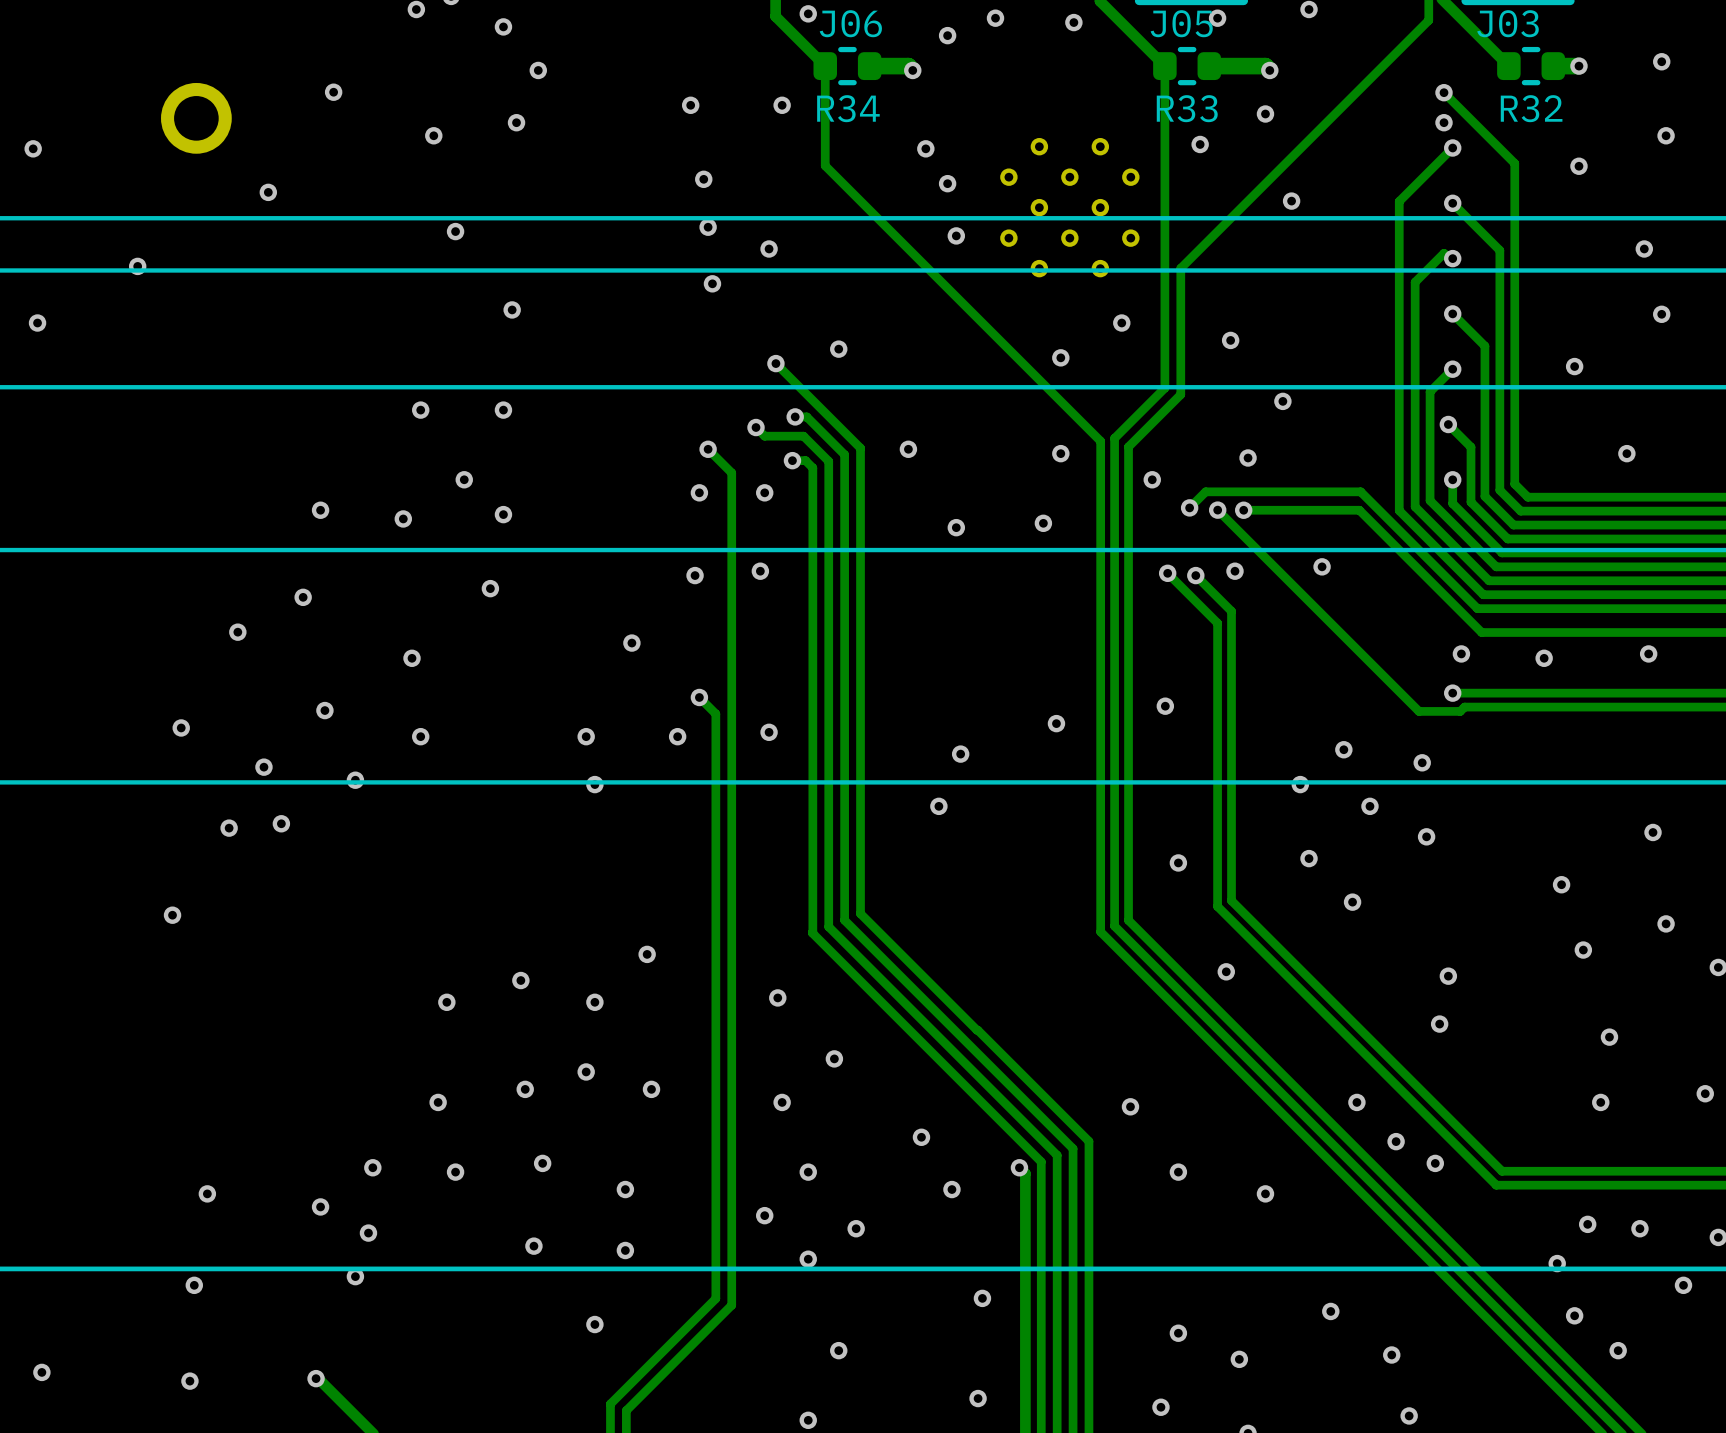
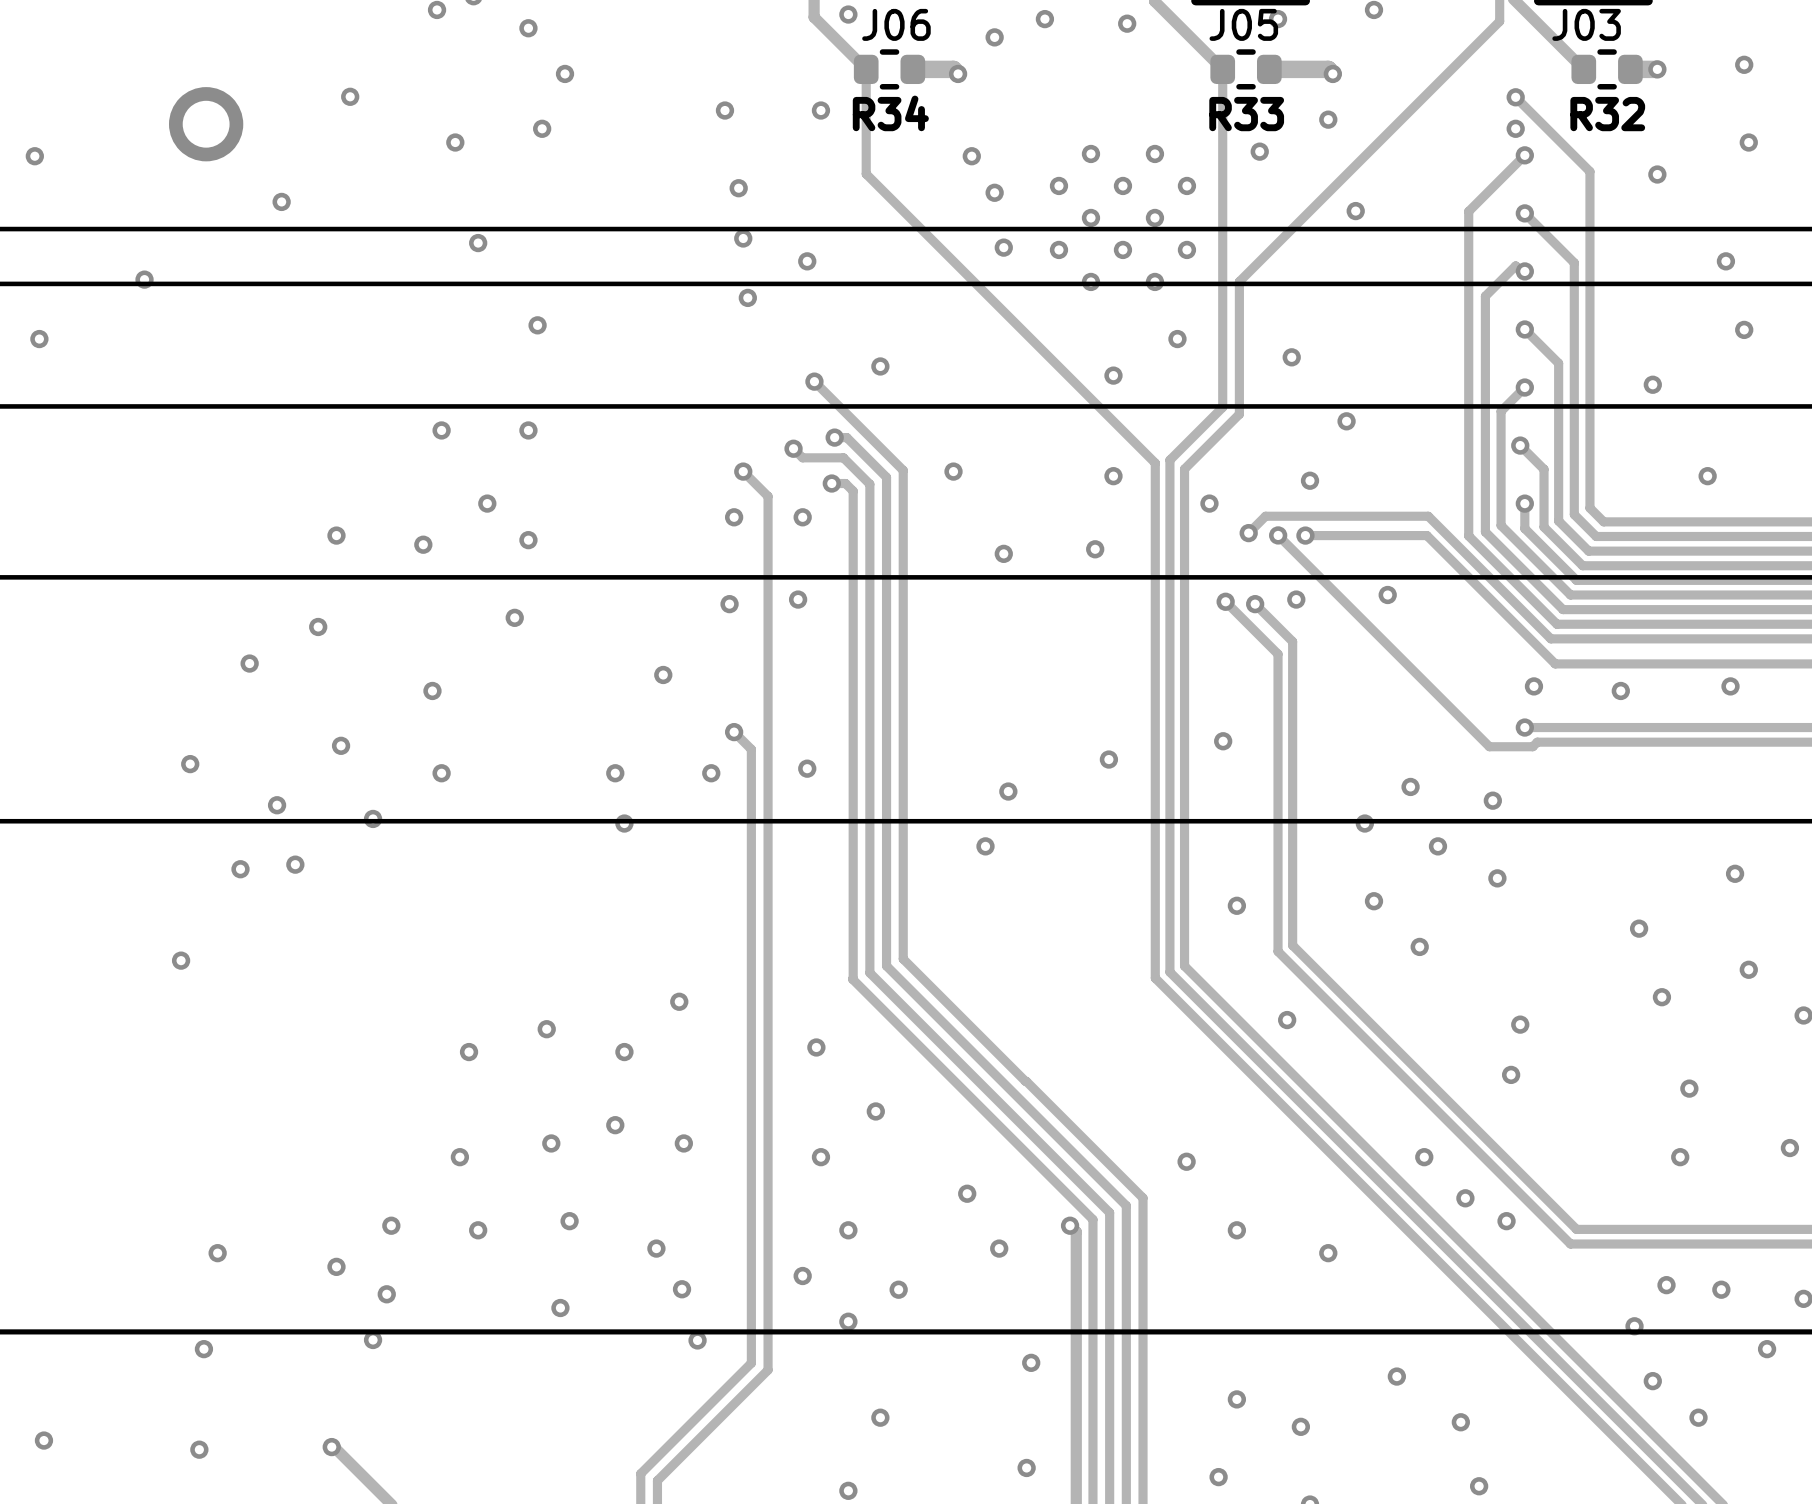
via: none -> (682, 1289)
via: (625, 1250) -> none
via: none -> (697, 1340)
via: (594, 1324) -> none

